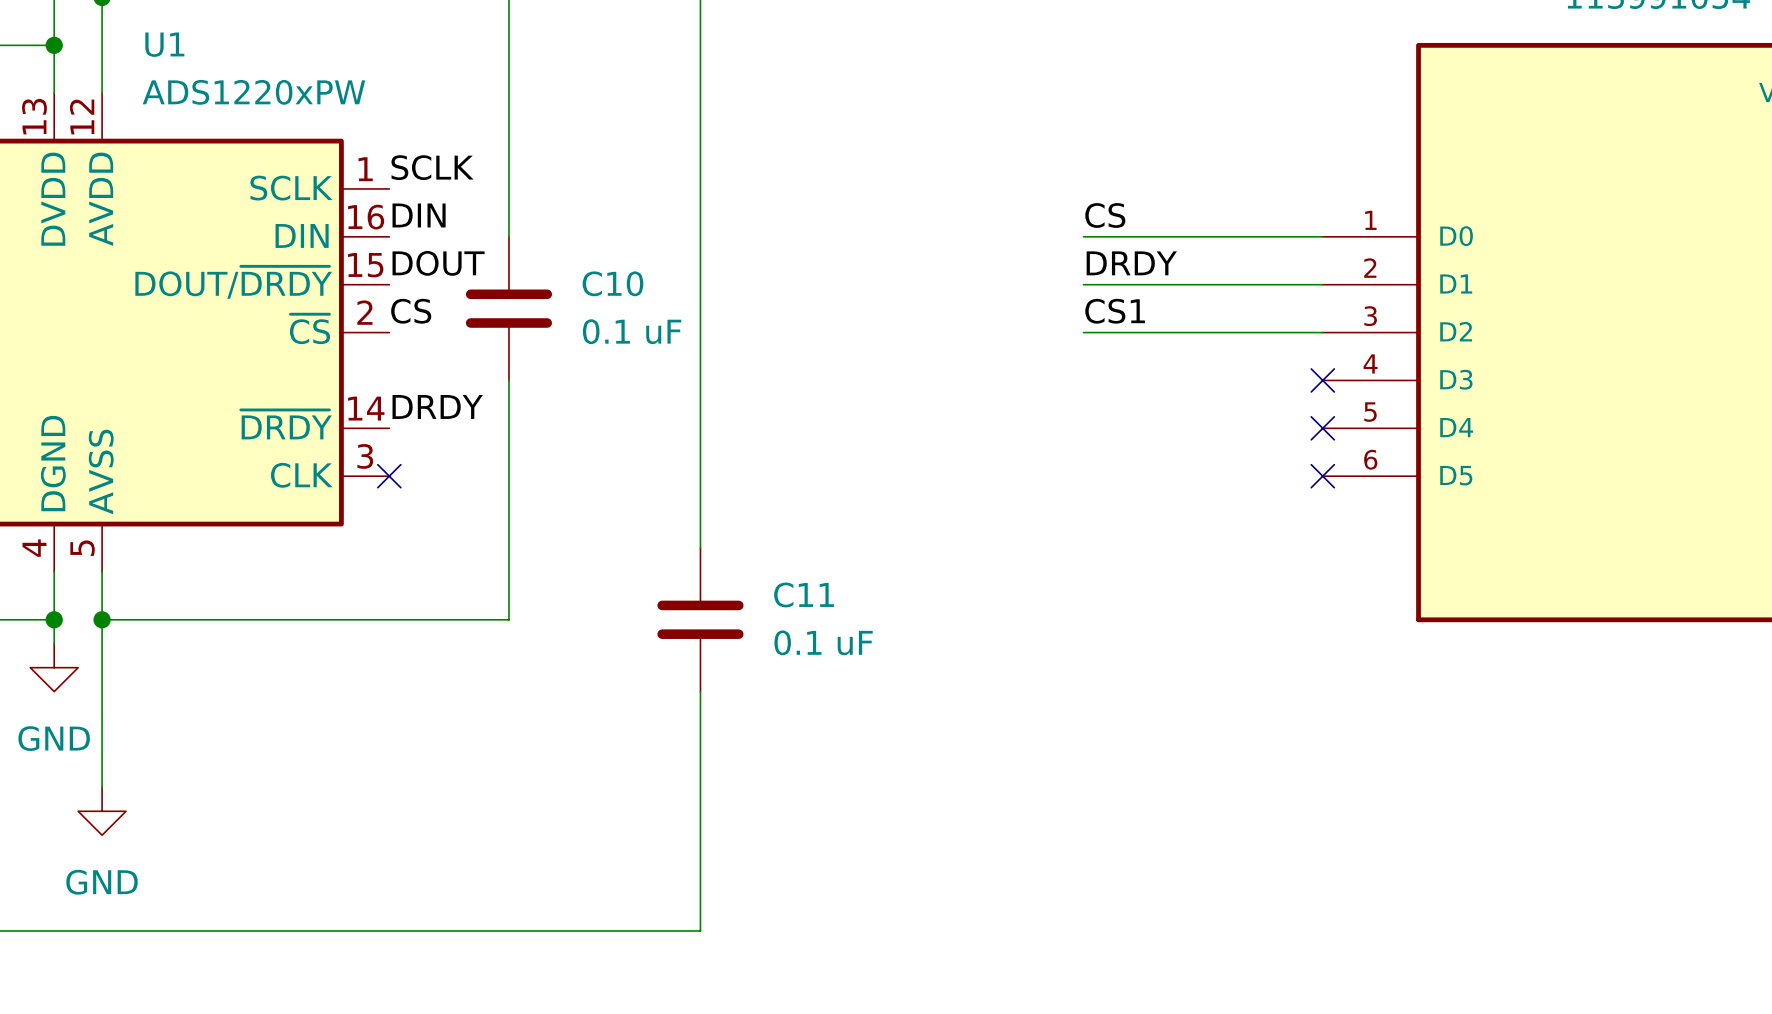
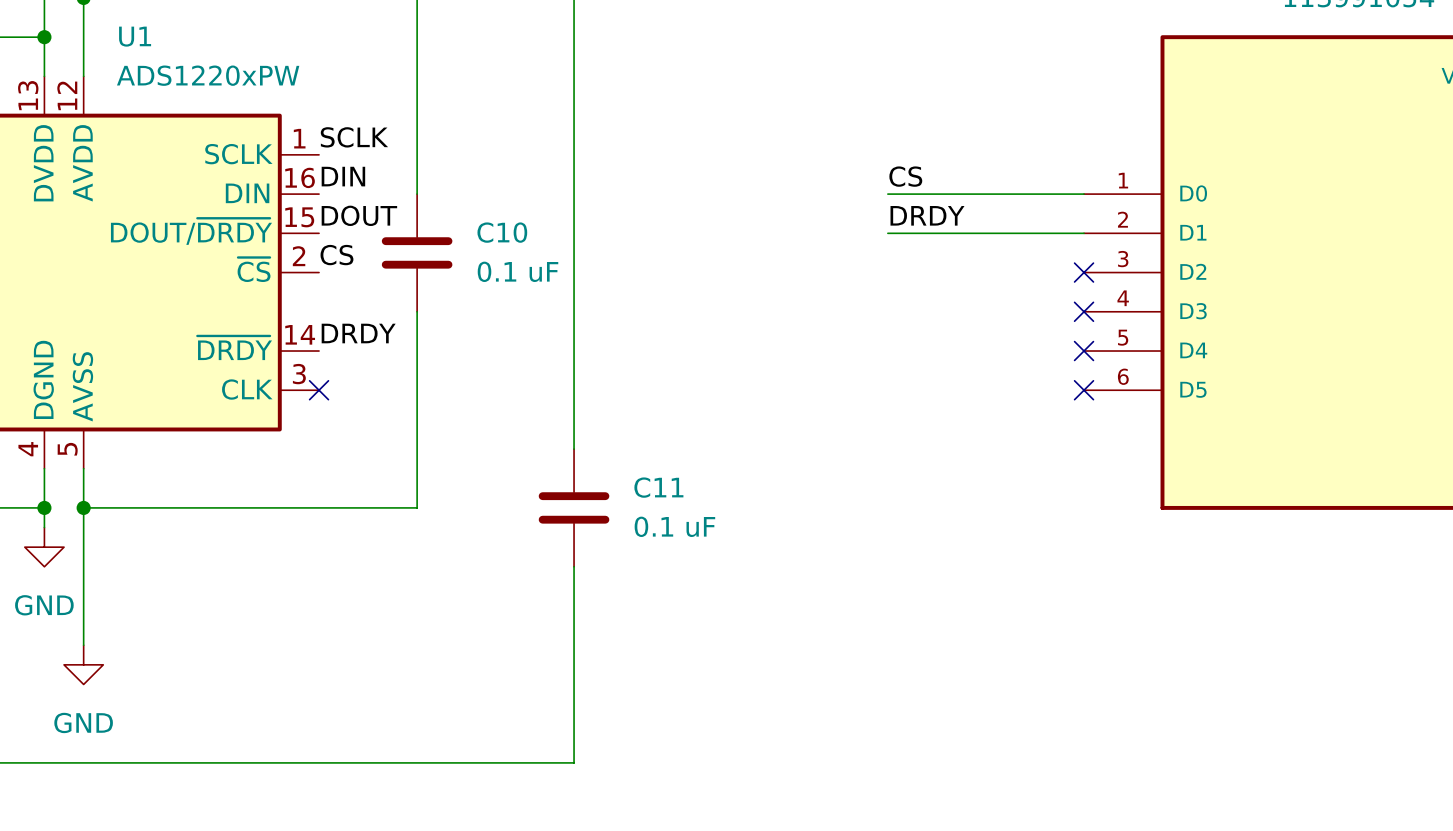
label: CS1 (1115, 311) -> none
wire: (1083, 332) (1322, 332) -> none
no-connect mark: none -> (1084, 272)

